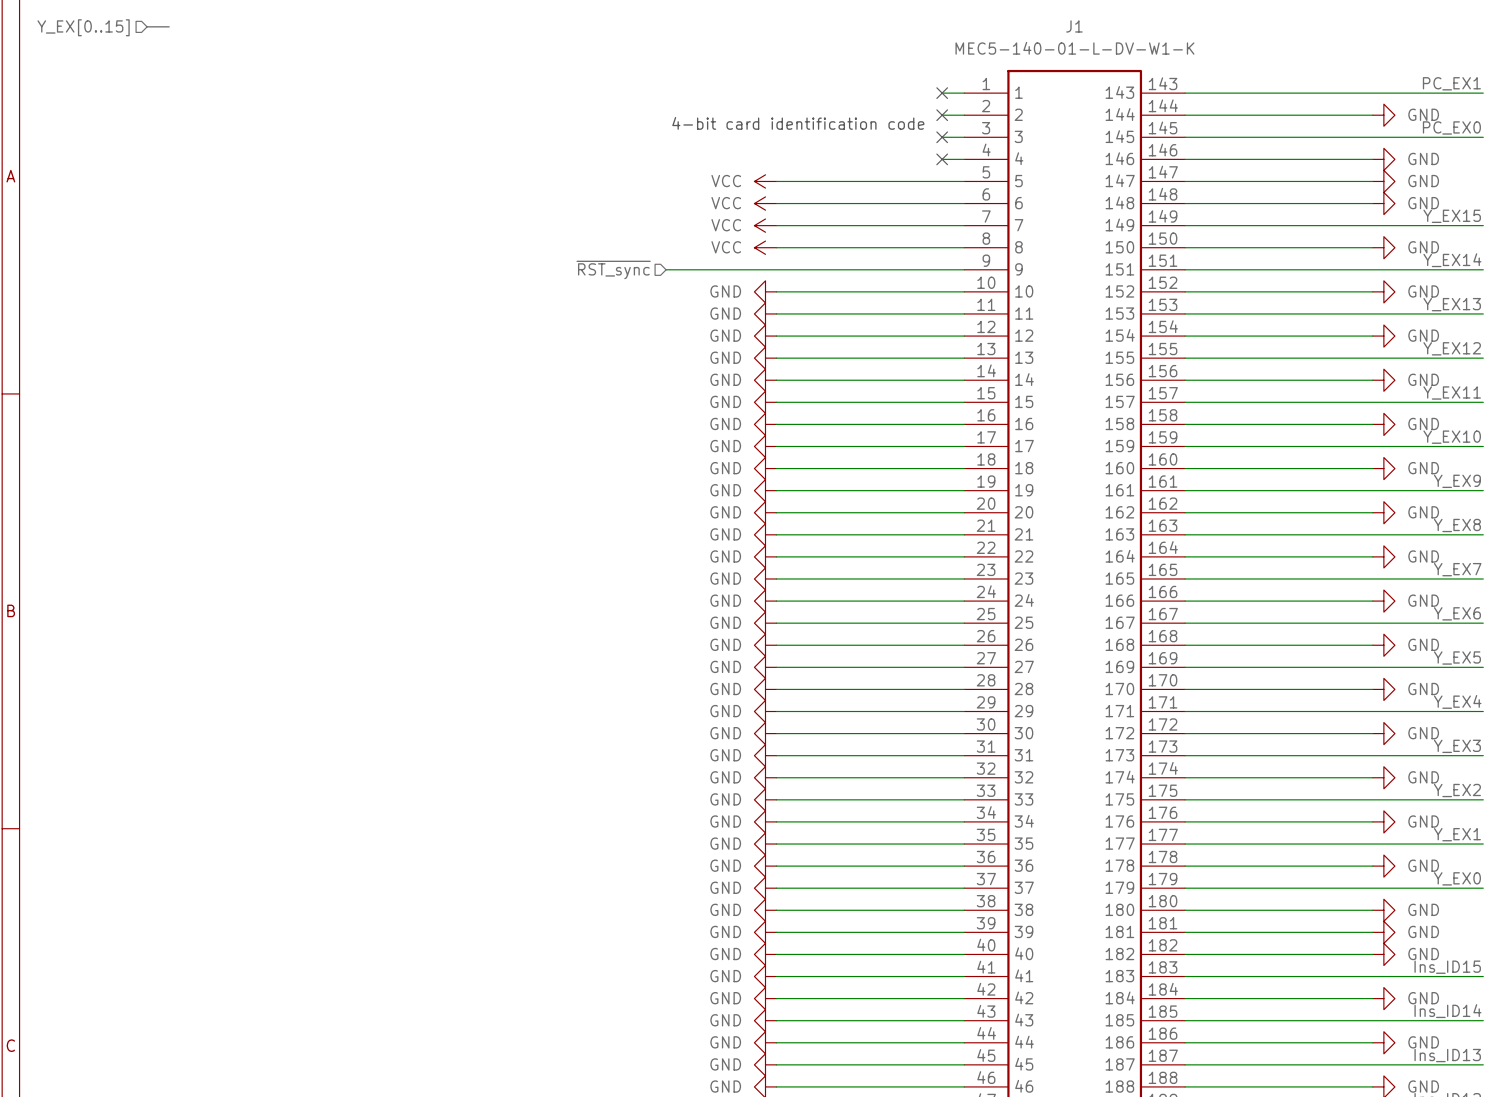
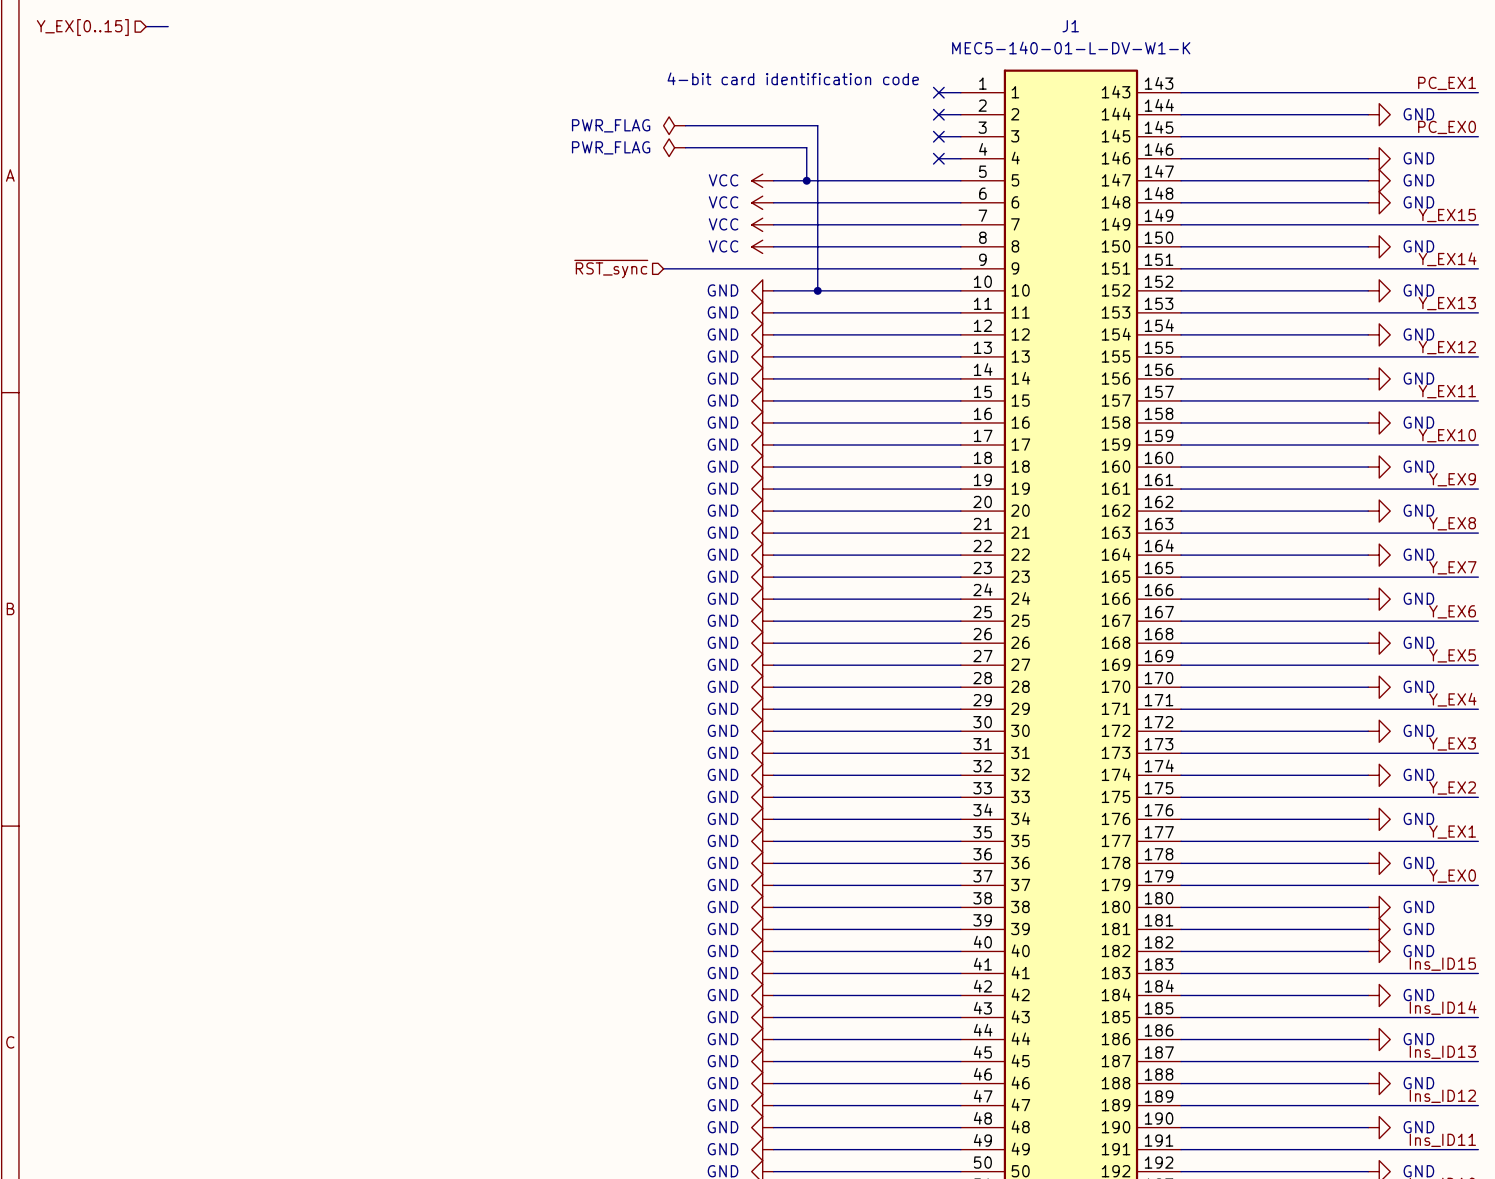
text position: 4-bit card identification code (798, 123) -> 4-bit card identification code (793, 78)
power symbol: none -> PWR_FLAG (674, 125)
wire: none -> (685, 125) (817, 125) (817, 290)
power symbol: none -> PWR_FLAG (674, 147)
wire: none -> (685, 147) (806, 147) (806, 180)
junction: none -> (806, 180)
junction: none -> (817, 290)

